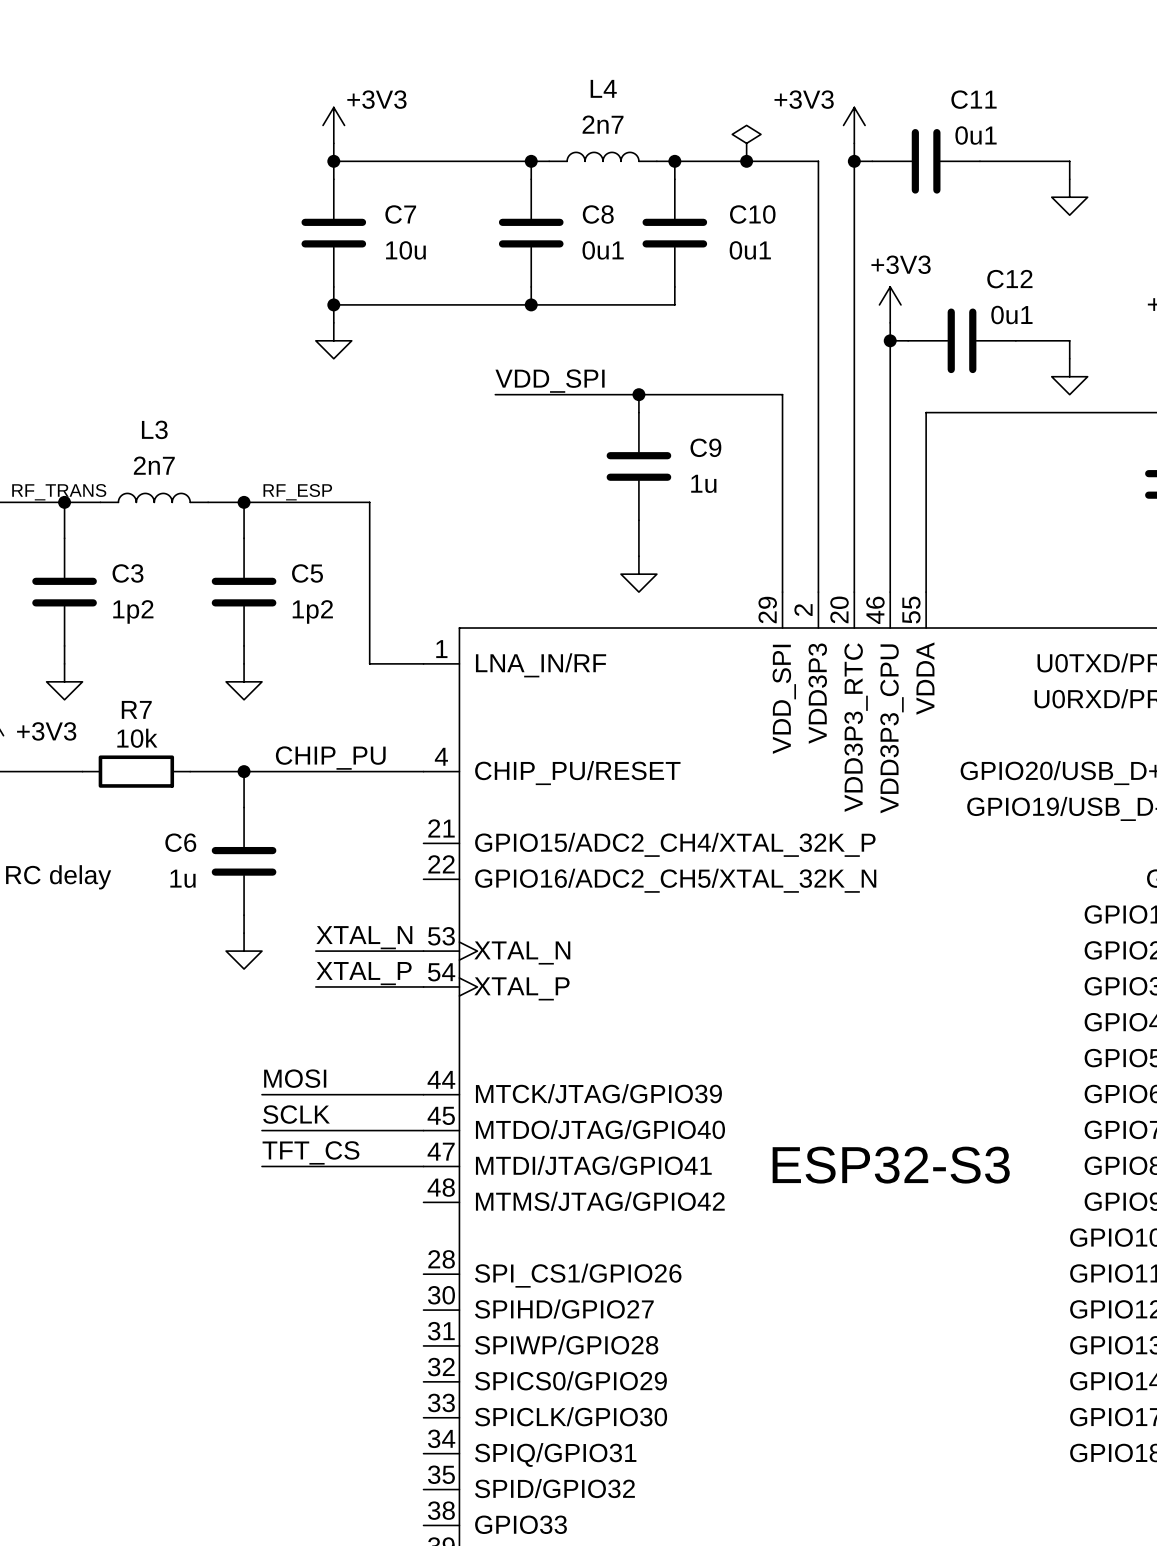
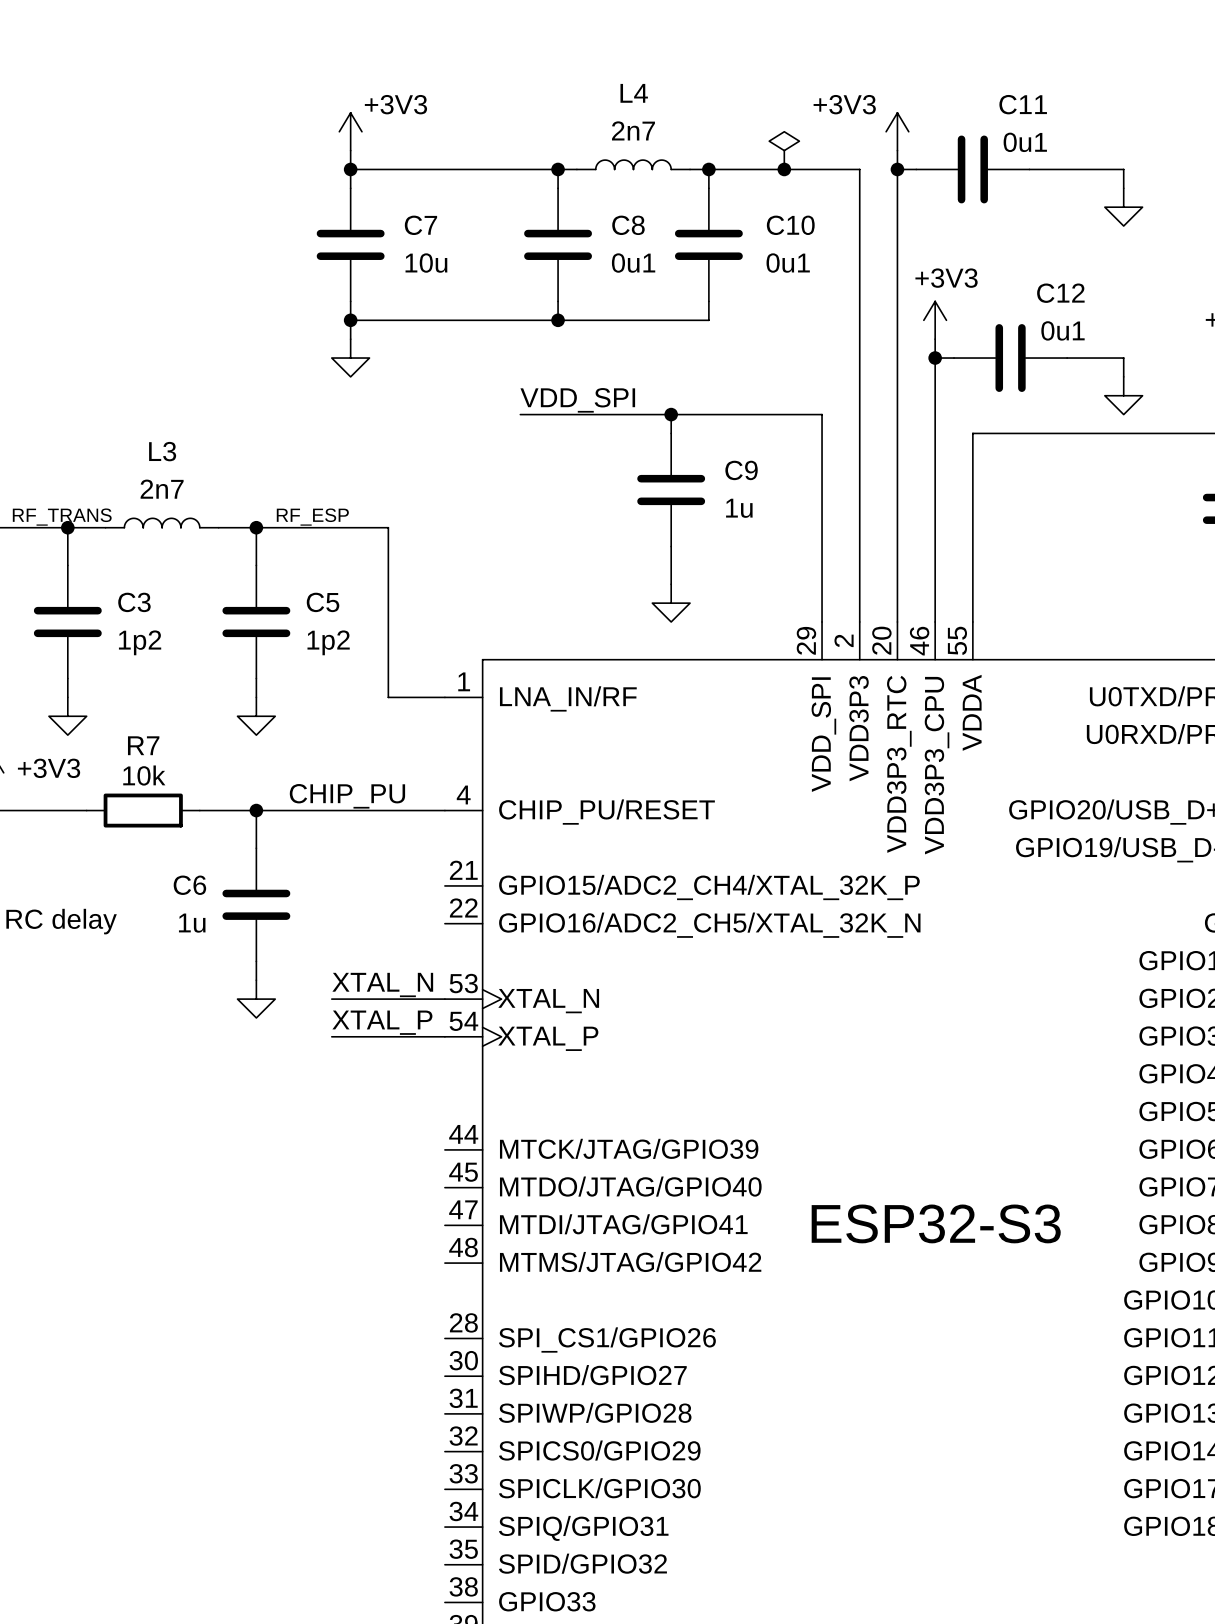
label: MOSI (295, 1078) -> none
wire: (262, 1094) (423, 1094) -> none
label: SCLK (296, 1114) -> none
wire: (262, 1130) (423, 1130) -> none
label: TFT_CS (310, 1152) -> none
wire: (262, 1166) (423, 1166) -> none

